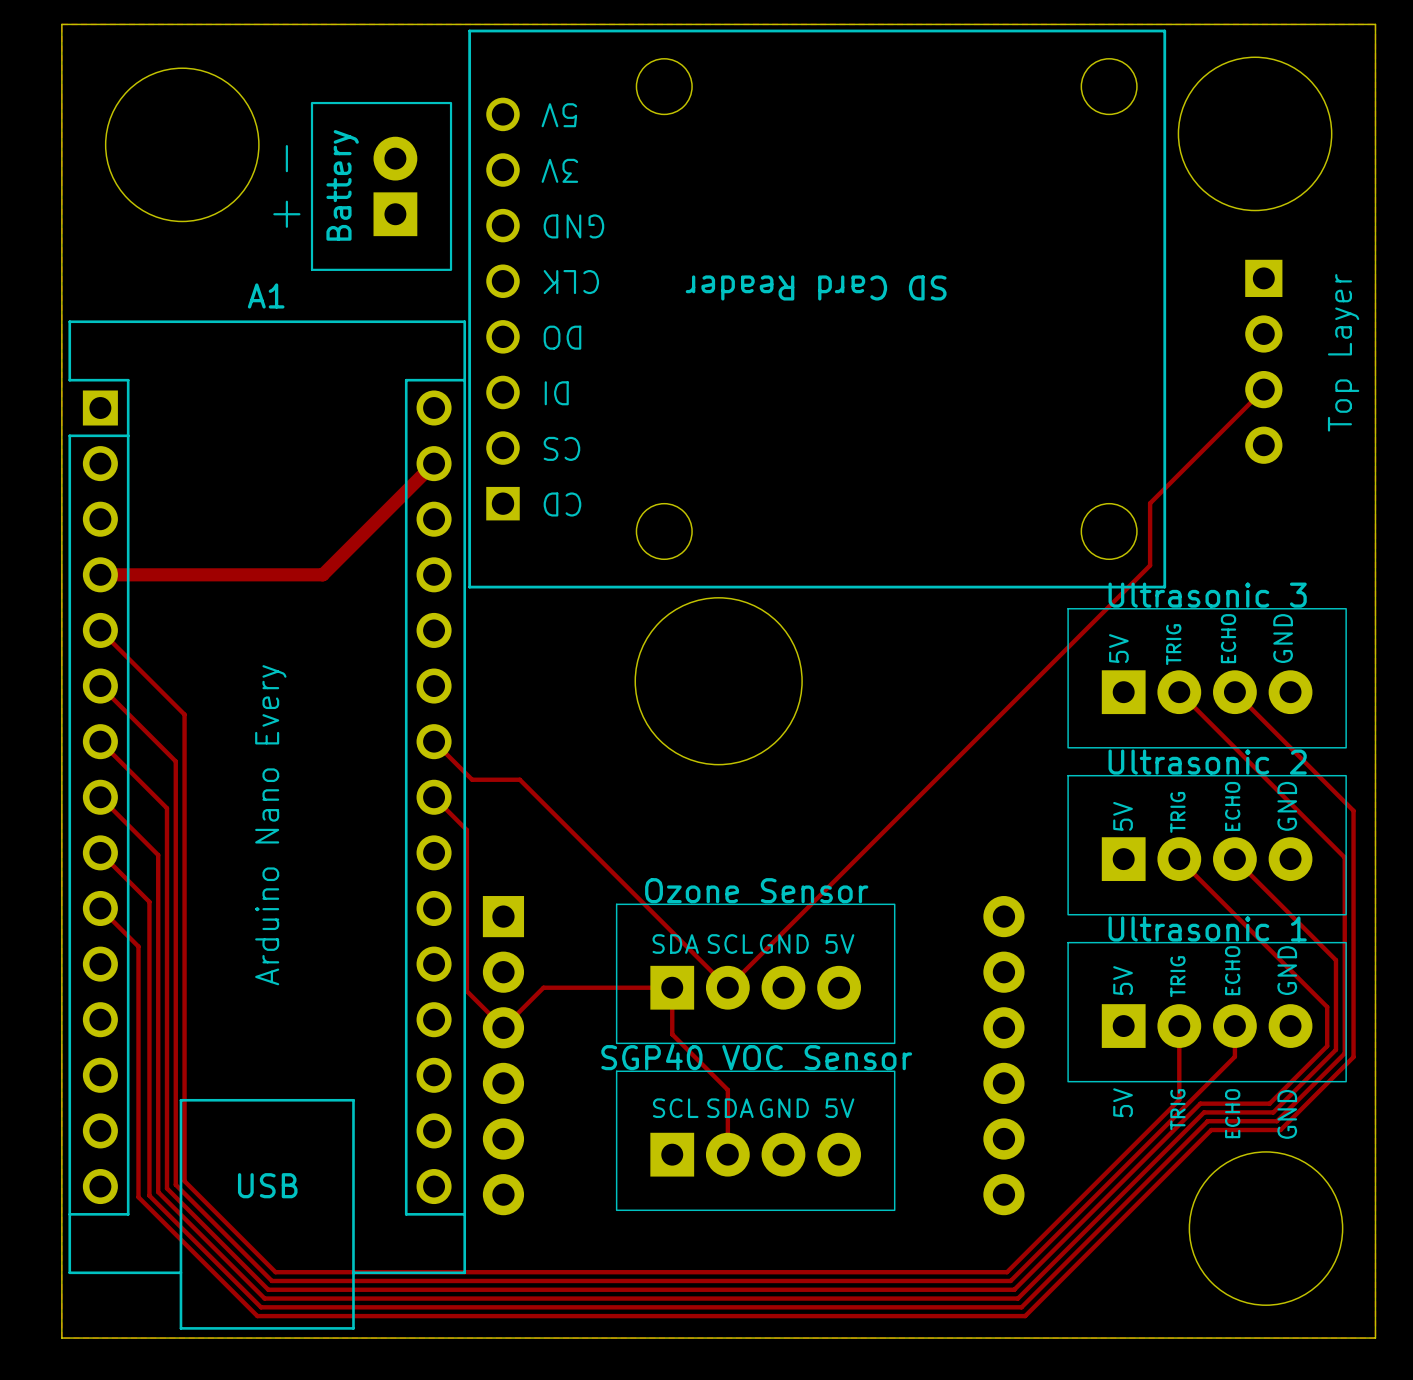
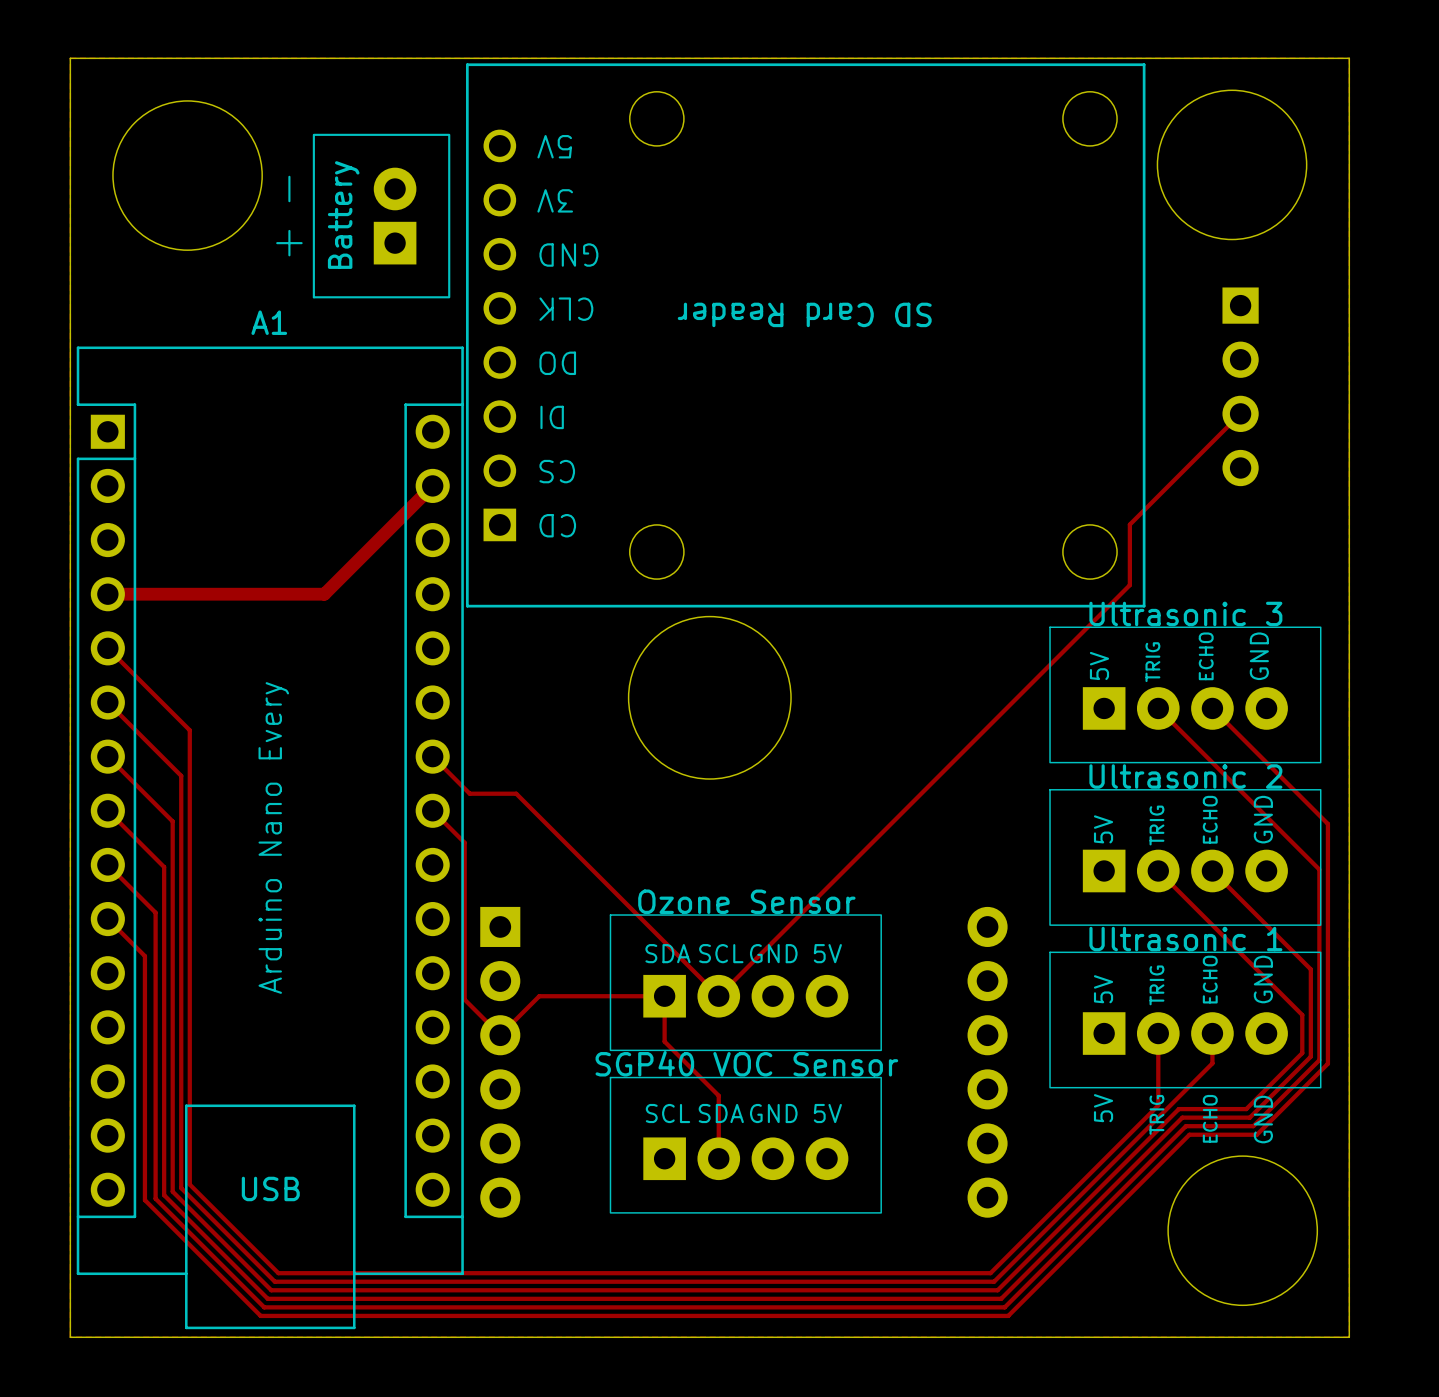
text: Top Layer (1343, 352) -> none

